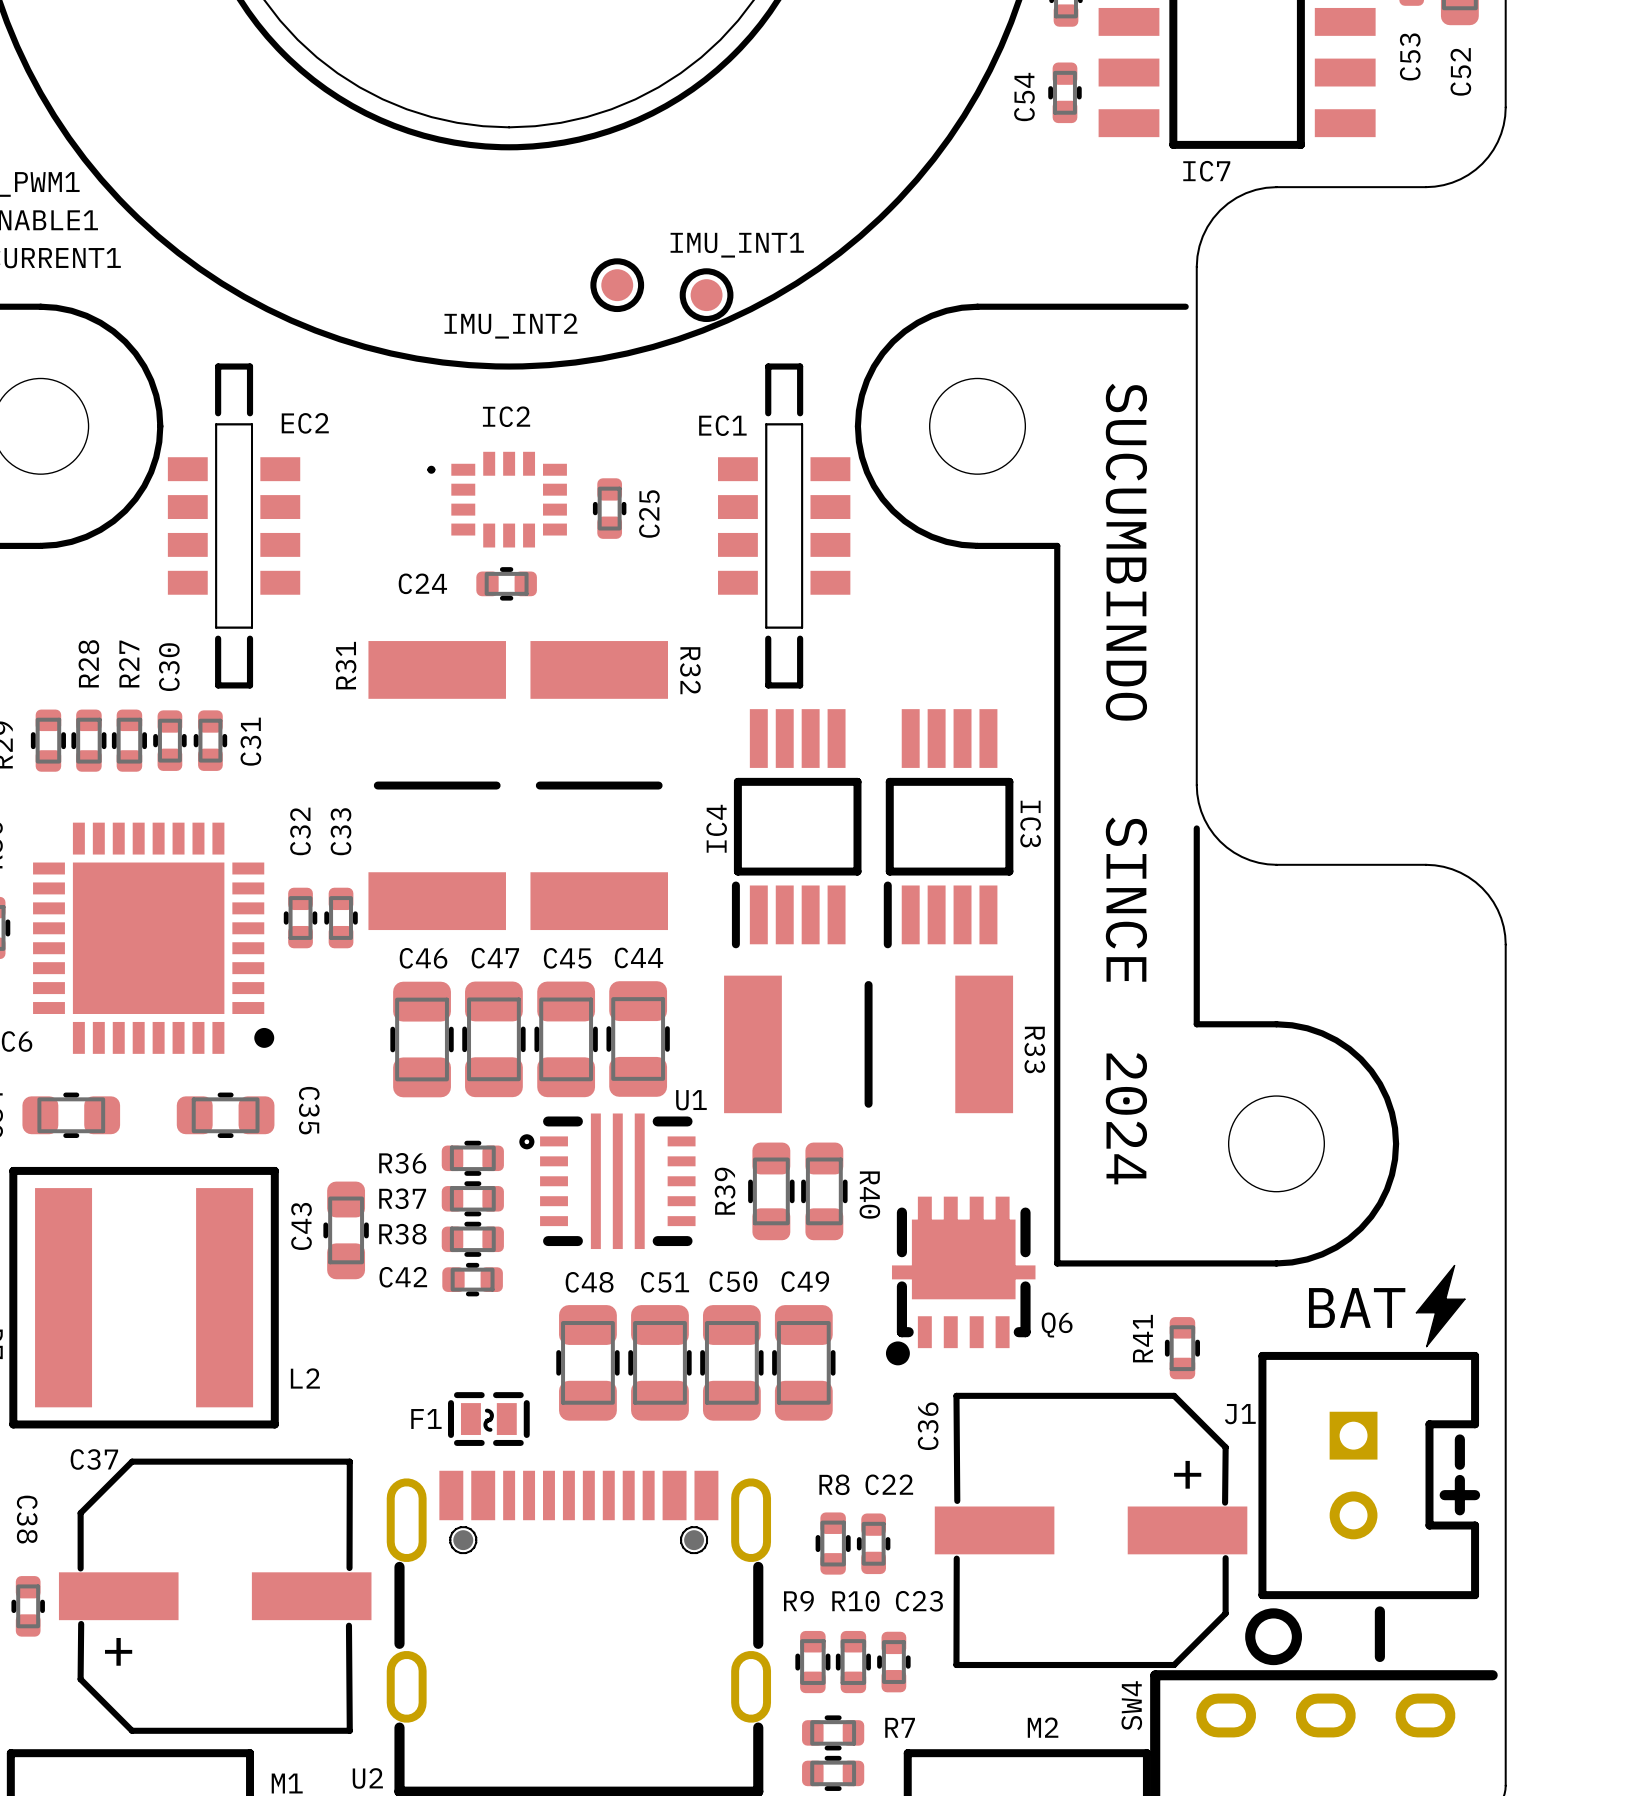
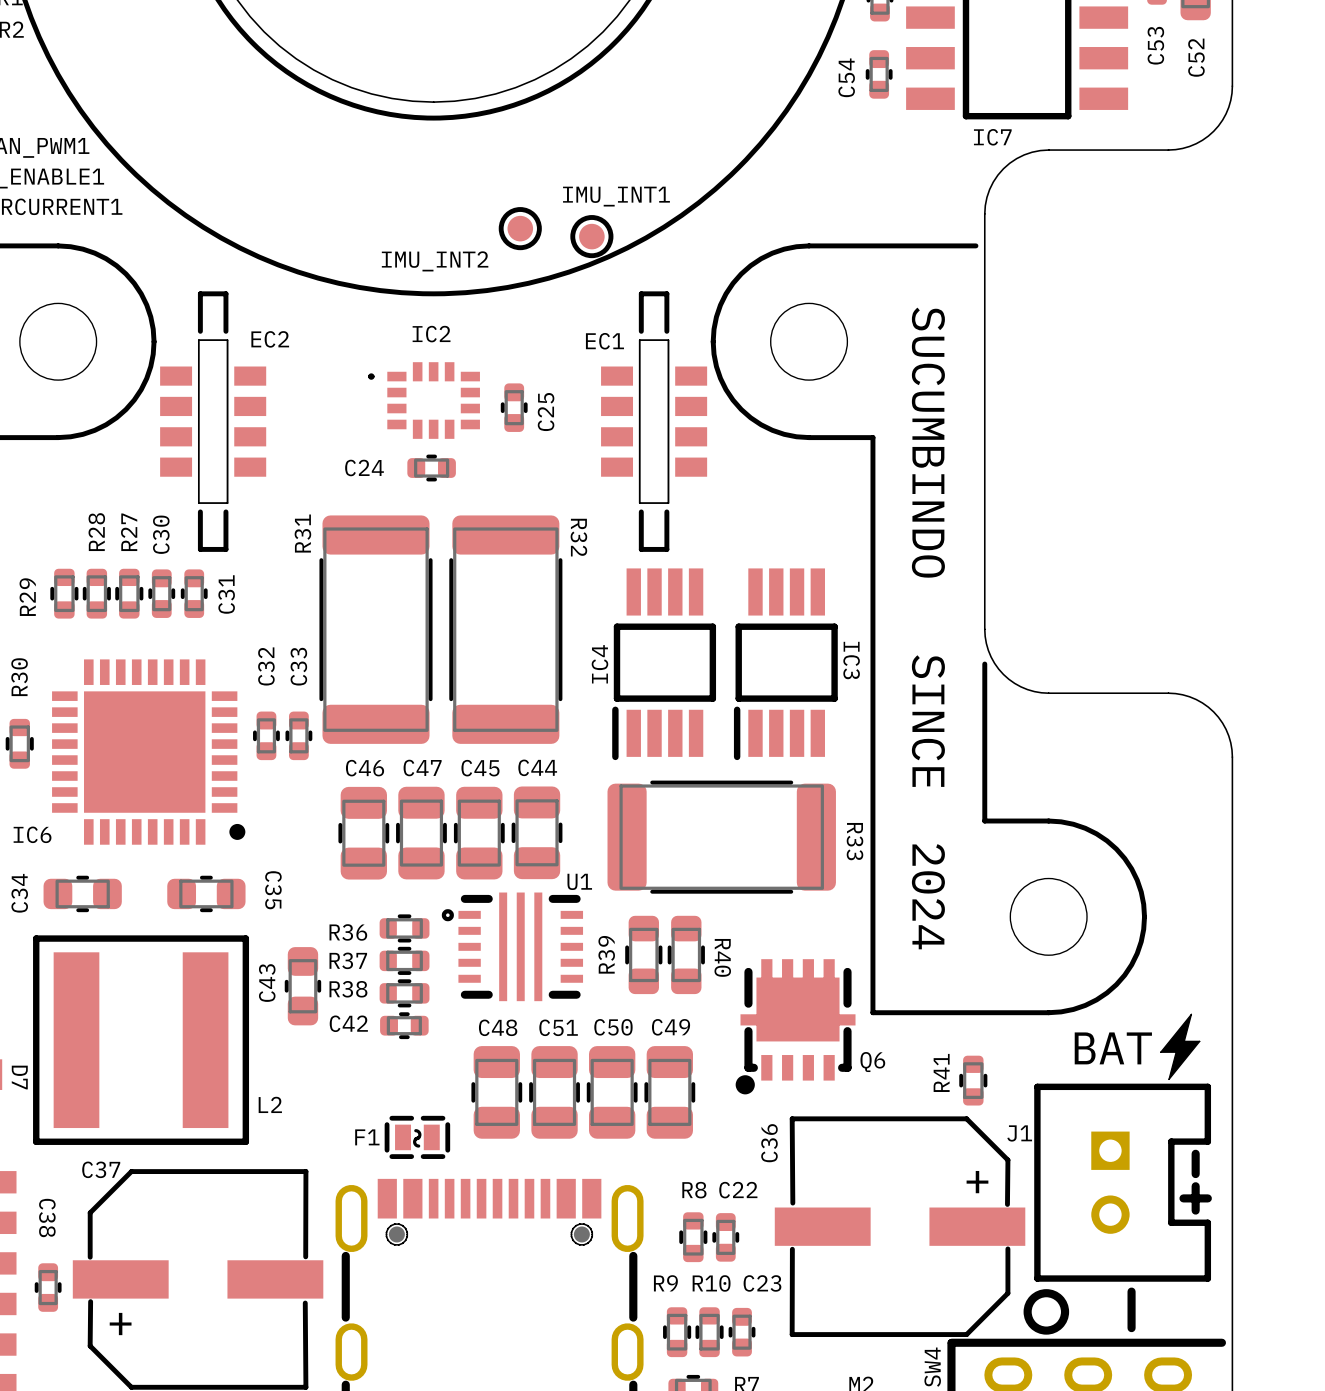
R31 footprint: [368, 641, 506, 931] -> [319, 515, 433, 744]
R32 footprint: [530, 641, 668, 931] -> [449, 515, 563, 744]
R33 footprint: [724, 975, 1014, 1114] -> [607, 780, 836, 894]

